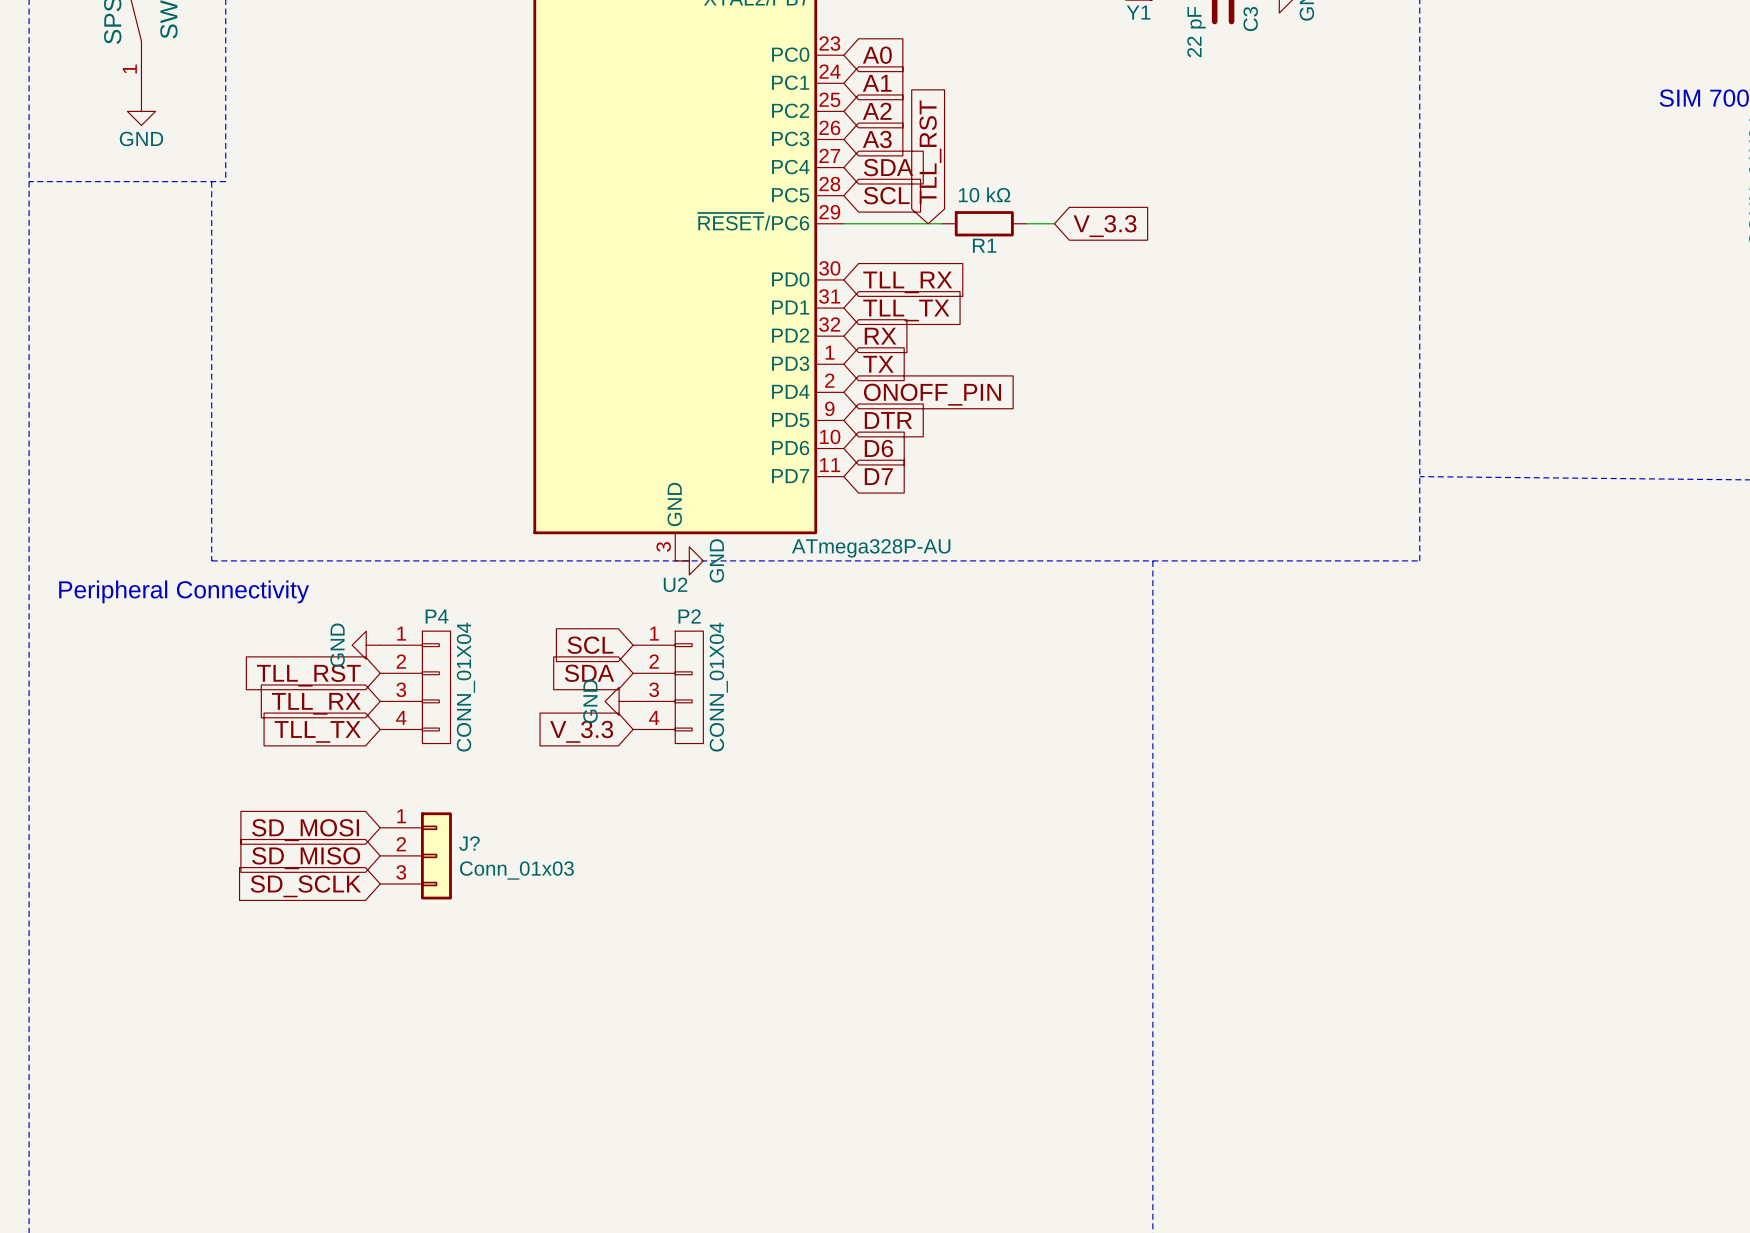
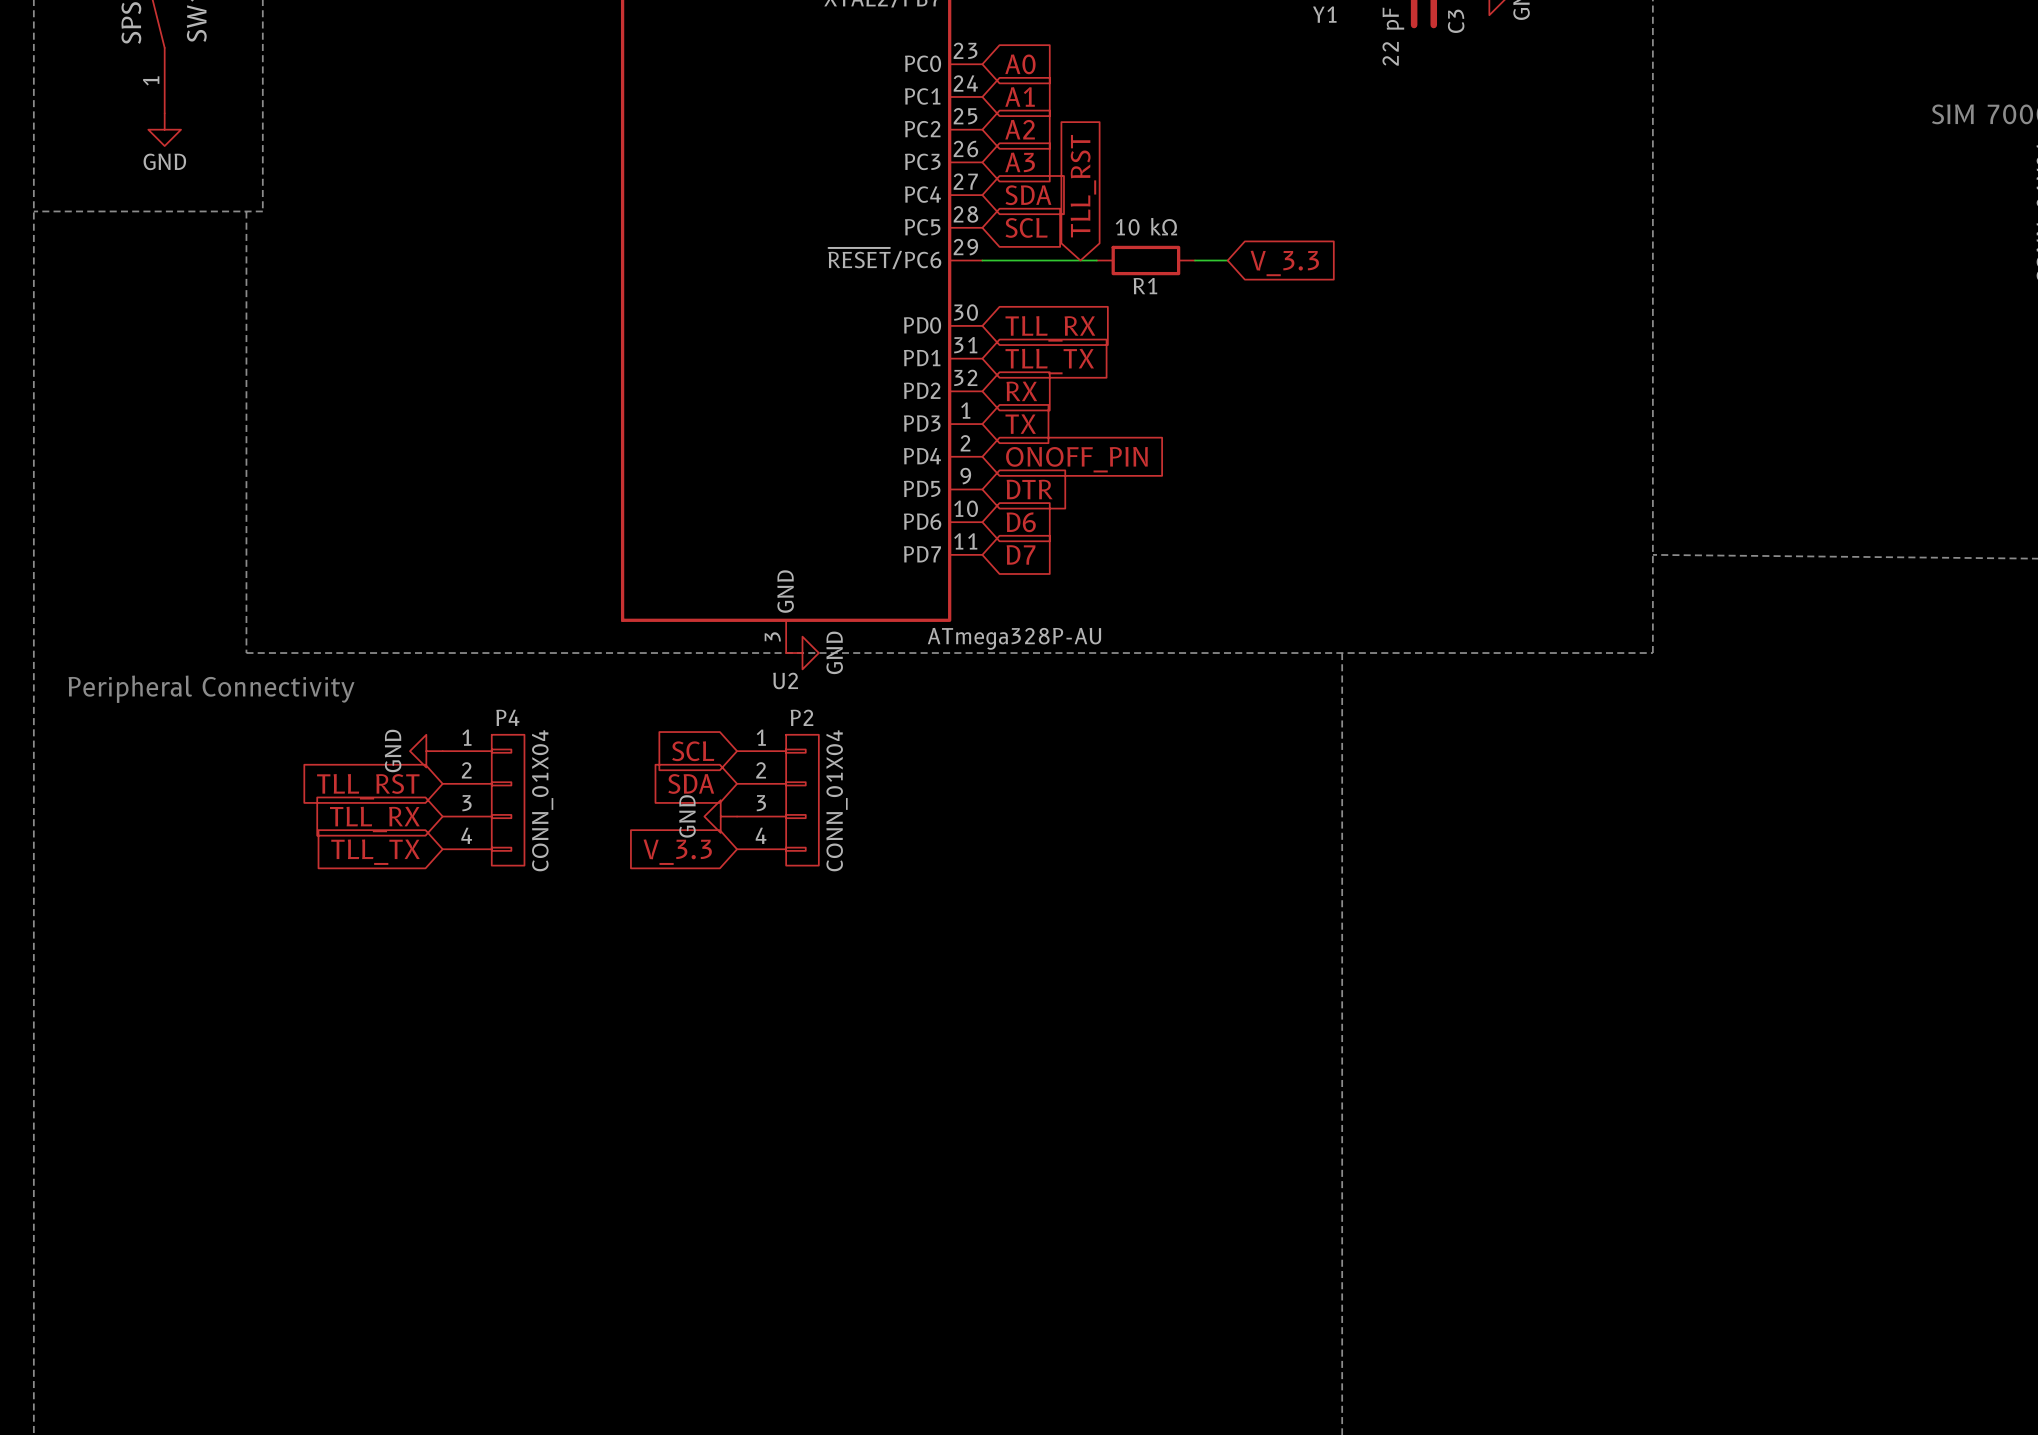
global label: SD_MOSI (305, 830) -> none
J?: Conn_01x03 (416, 855) -> none
global label: SD_MISO (306, 858) -> none
global label: SD_SCLK (305, 886) -> none

